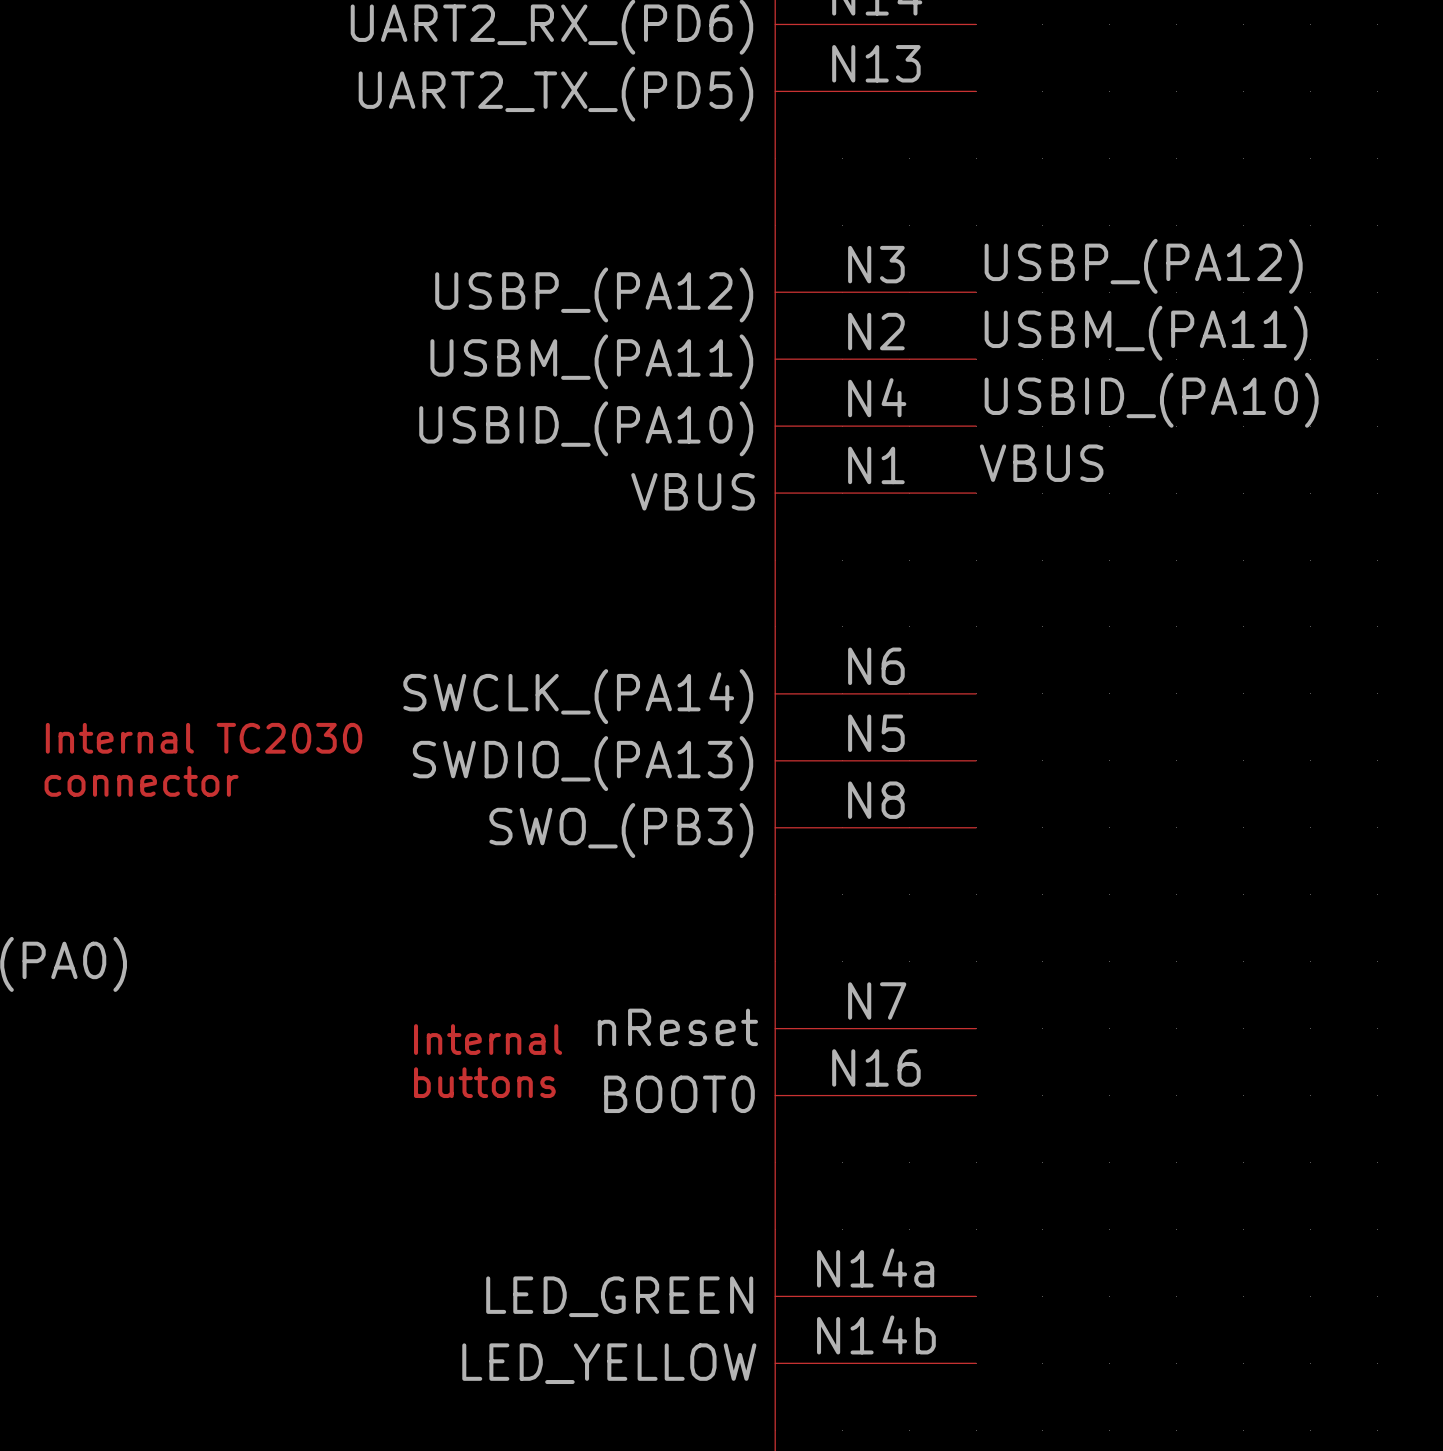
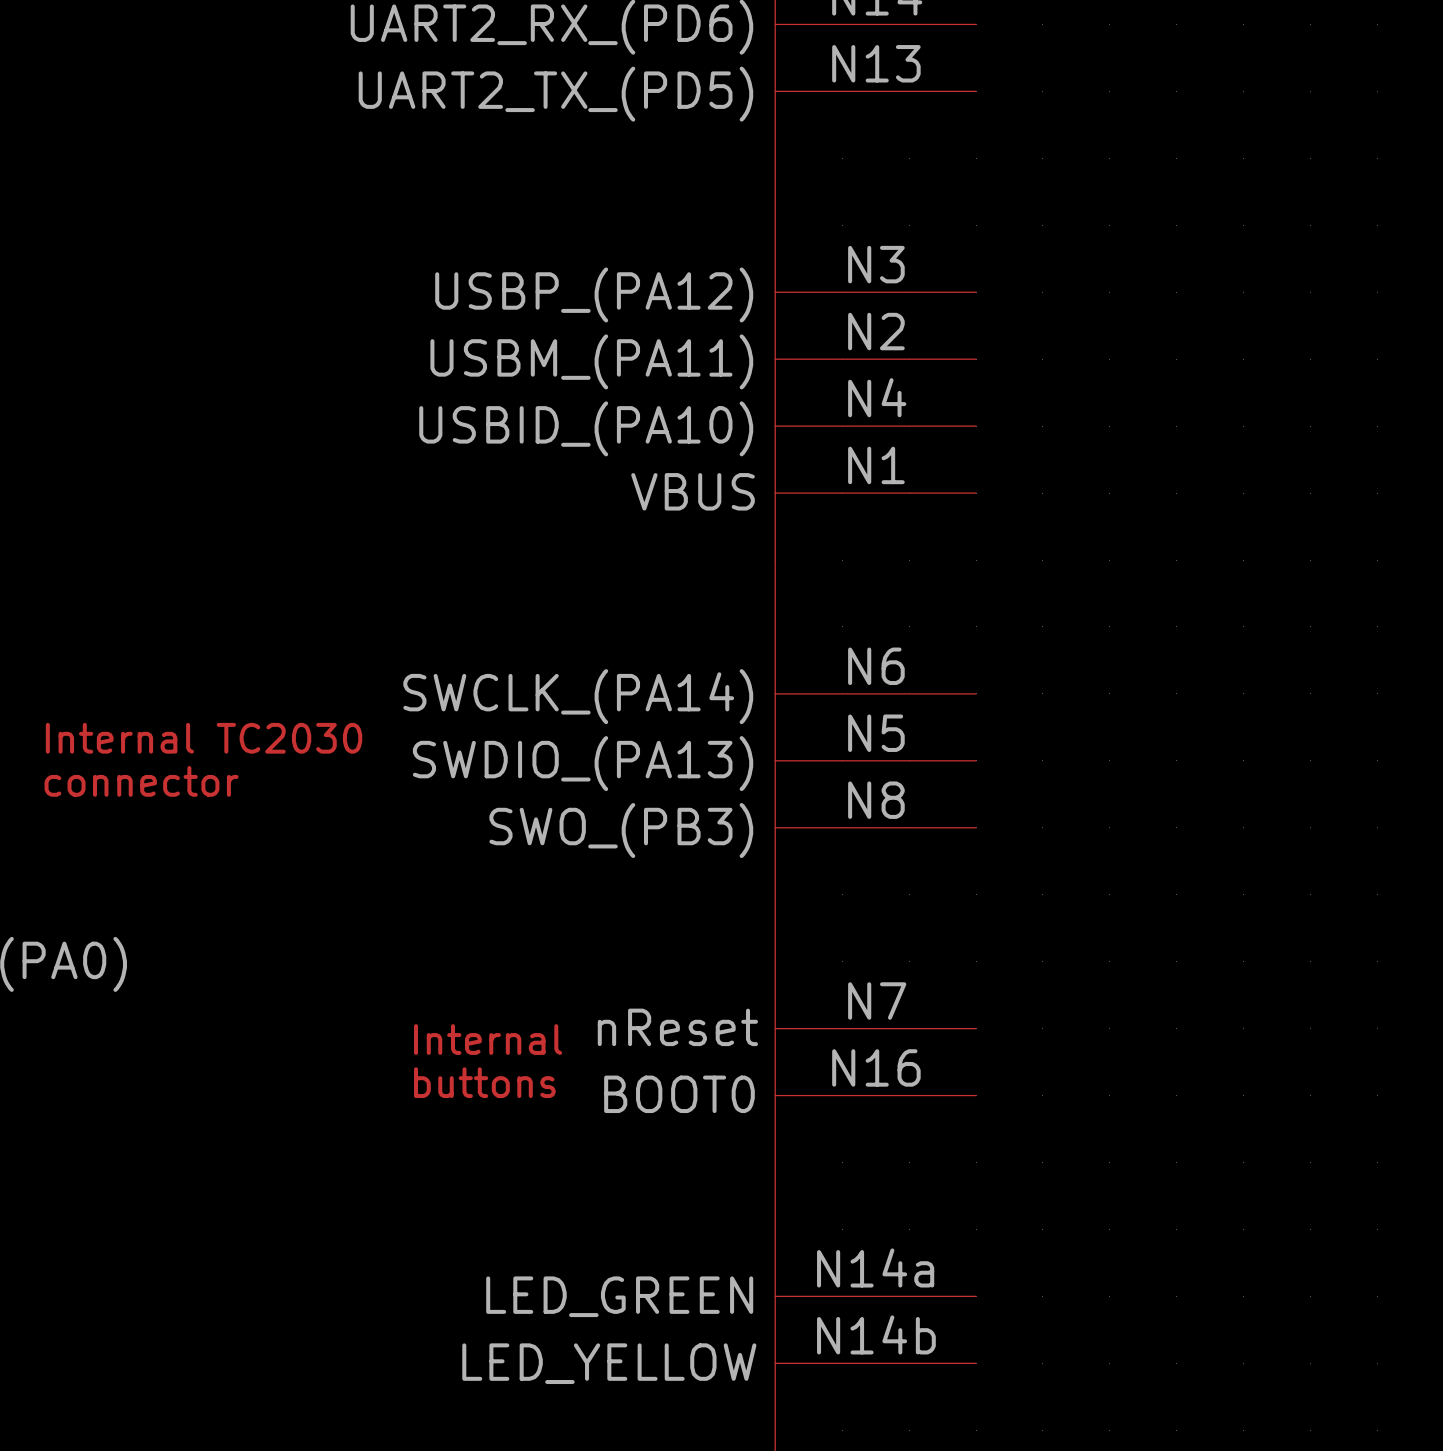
label: USBP_(PA12) (1143, 266) -> none
label: USBM_(PA11) (1146, 333) -> none
label: USBID_(PA10) (1151, 400) -> none
label: VBUS (1041, 463) -> none

